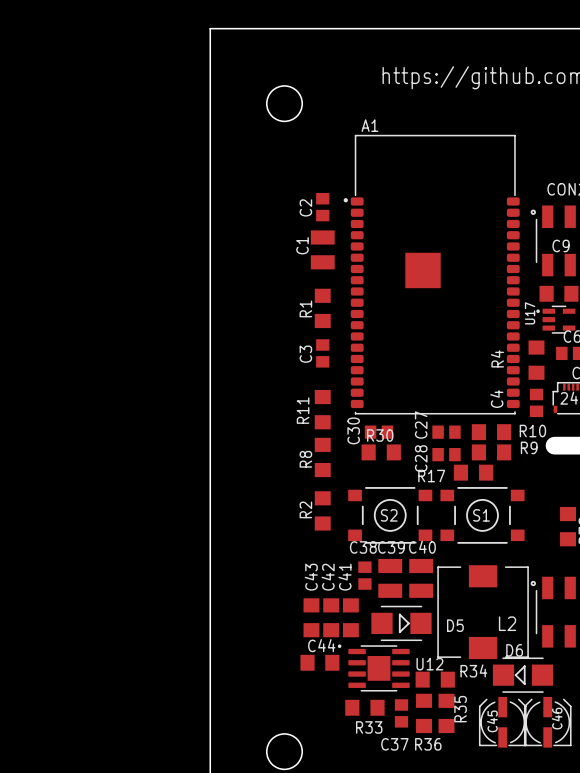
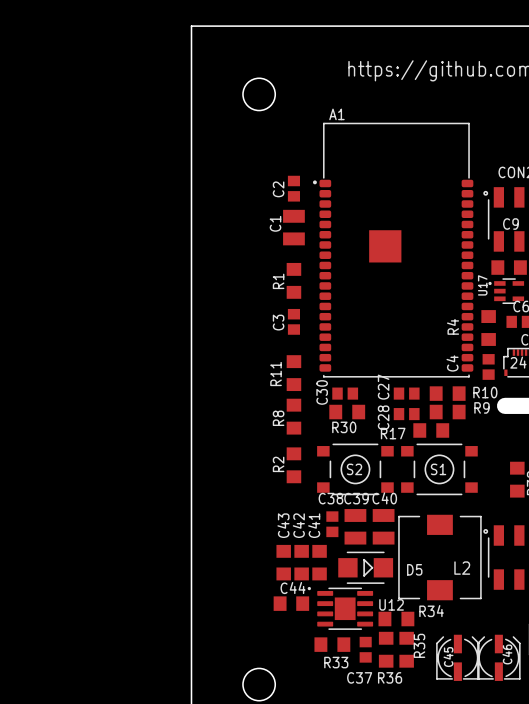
R30 name position: R30 (380, 435) -> R30 (344, 427)
D6: (523, 675) -> none

